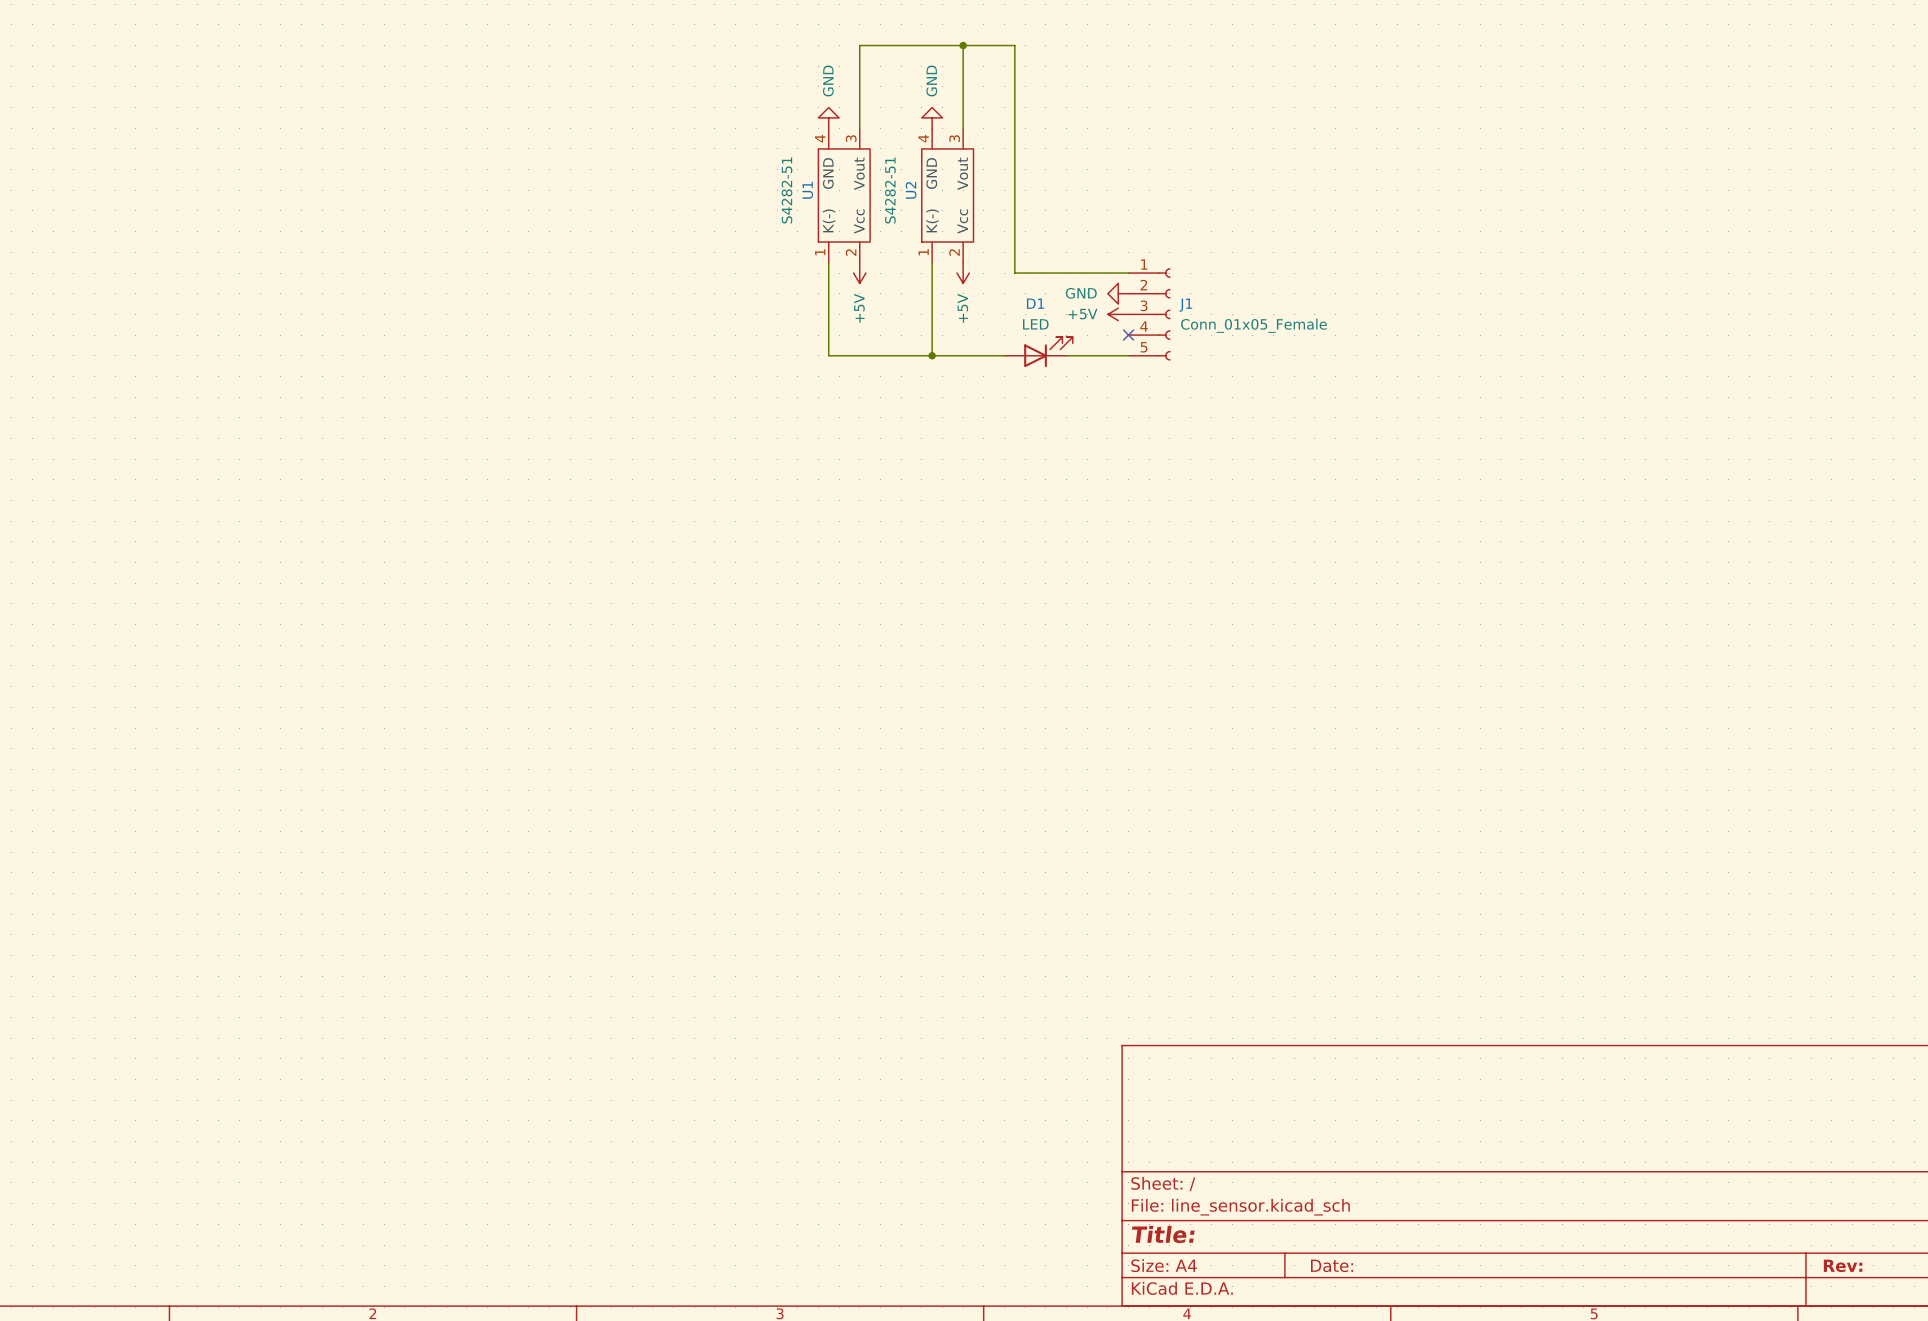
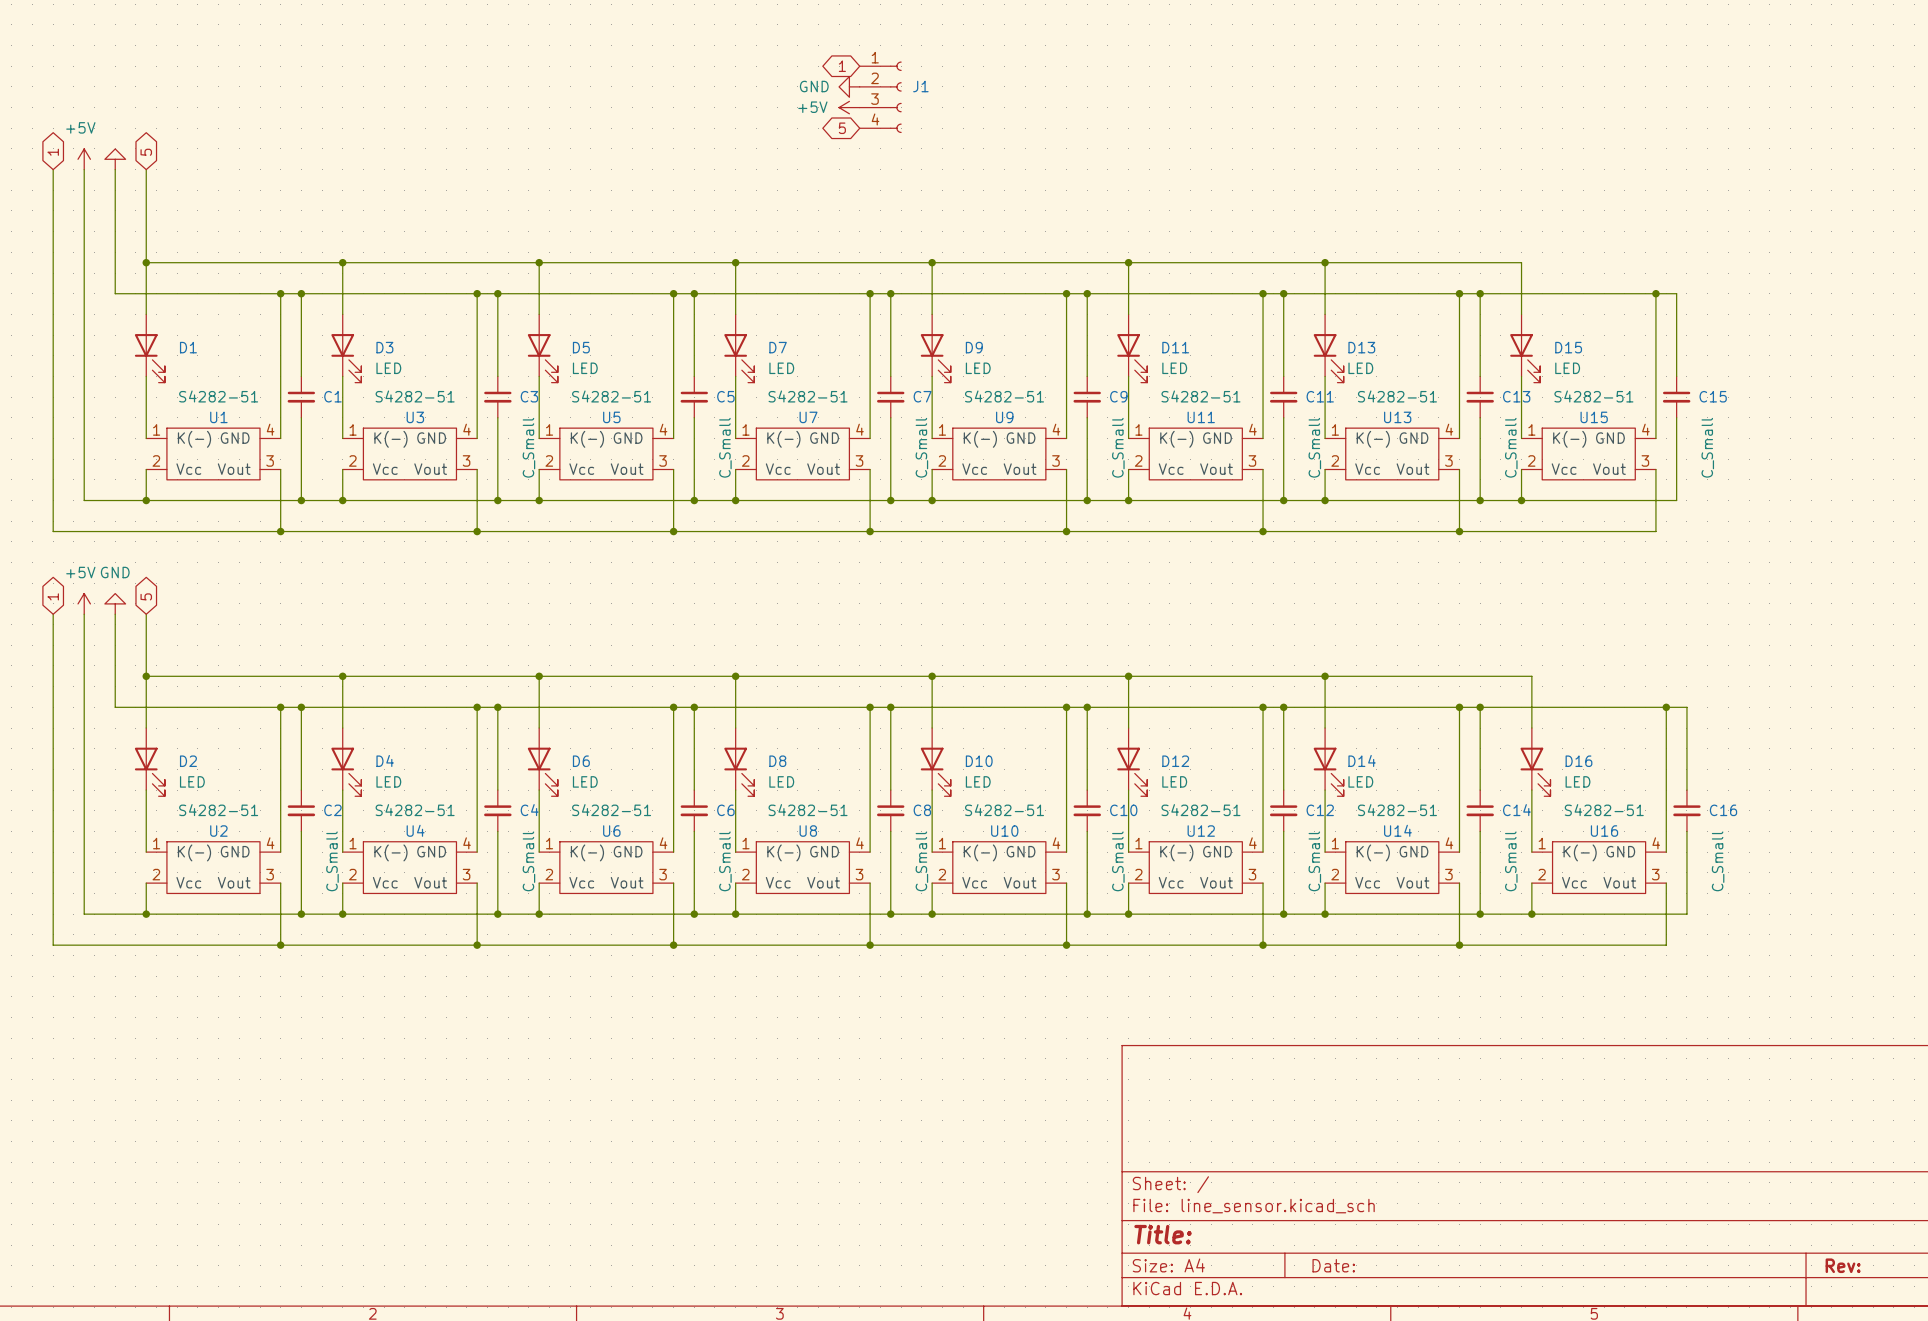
wire: (963, 45) (963, 128) -> none
junction: (963, 45) -> none
global label: none -> 1 (842, 66)
power symbol: none -> +5V (849, 107)
power symbol rotation: 0° (828, 117) -> 90° counterclockwise (849, 86)
power symbol position: GND (828, 117) -> GND (849, 86)
power symbol: GND (932, 117) -> none
global label: none -> 5 (842, 128)
wire: (859, 128) (859, 45) (1014, 45) (1014, 273) (1128, 273) -> none
global label: none -> 1 (53, 152)
global label: none -> 5 (146, 152)
power symbol: none -> +5V (84, 159)
power symbol: none -> (115, 159)
wire: none -> (53, 169) (53, 531) (1655, 531) (1655, 469)
wire: none -> (84, 169) (84, 500) (1676, 500) (1676, 417)
wire: none -> (115, 169) (115, 293) (1676, 293) (1676, 376)
wire: none -> (146, 169) (146, 314)
U1 rotation: 0° (844, 195) -> 90° clockwise (213, 453)
U1 position: (844, 195) -> (213, 453)
U2 rotation: 0° (947, 195) -> 90° clockwise (213, 867)
U2 position: (947, 195) -> (213, 867)
wire: none -> (146, 262) (1521, 262) (1521, 314)
junction: none -> (146, 262)
wire: none -> (342, 262) (342, 314)
junction: none -> (342, 262)
wire: none -> (539, 262) (539, 314)
junction: none -> (539, 262)
wire: none -> (735, 262) (735, 314)
junction: none -> (735, 262)
wire: (828, 262) (828, 355) (1004, 355) -> none
junction: none -> (932, 262)
wire: none -> (1128, 262) (1128, 314)
junction: none -> (1128, 262)
wire: none -> (1325, 262) (1325, 314)
junction: none -> (1325, 262)
J1 symbol: [1128, 268, 1171, 361] -> [859, 61, 902, 134]
power symbol: +5V (859, 273) -> none
power symbol: +5V (963, 273) -> none
wire: none -> (280, 293) (280, 438)
junction: none -> (280, 293)
wire: none -> (301, 293) (301, 376)
junction: none -> (301, 293)
wire: none -> (477, 293) (477, 438)
junction: none -> (477, 293)
wire: none -> (497, 293) (497, 376)
junction: none -> (497, 293)
wire: none -> (673, 293) (673, 438)
junction: none -> (673, 293)
wire: none -> (694, 293) (694, 376)
junction: none -> (694, 293)
wire: none -> (870, 293) (870, 438)
junction: none -> (870, 293)
wire: none -> (890, 293) (890, 376)
junction: none -> (890, 293)
wire: none -> (1066, 293) (1066, 438)
junction: none -> (1066, 293)
wire: none -> (1087, 293) (1087, 376)
junction: none -> (1087, 293)
power symbol: GND (1118, 293) -> none
wire: none -> (1263, 293) (1263, 438)
junction: none -> (1263, 293)
wire: none -> (1283, 293) (1283, 376)
junction: none -> (1283, 293)
wire: none -> (1459, 293) (1459, 438)
junction: none -> (1459, 293)
wire: none -> (1480, 293) (1480, 376)
junction: none -> (1480, 293)
wire: none -> (1655, 293) (1655, 438)
junction: none -> (1655, 293)
power symbol: +5V (1118, 314) -> none
D1 value: LED (1035, 324) -> none
J1 value: Conn_01x05_Female (1253, 325) -> none
no-connect mark: (1128, 335) -> none
D3: none -> LED (346, 348)
D5: none -> LED (542, 348)
D7: none -> LED (739, 348)
D9: none -> LED (935, 348)
D11: none -> LED (1132, 348)
D13: none -> LED (1328, 348)
D15: none -> LED (1525, 348)
D1 position: (1038, 352) -> (149, 348)
D1 rotation: 0° (1048, 352) -> 90° clockwise (149, 358)
junction: (932, 355) -> none
wire: (1066, 355) (1128, 355) -> none
wire: none -> (146, 376) (146, 438)
wire: none -> (342, 376) (342, 438)
wire: none -> (539, 376) (539, 438)
wire: none -> (735, 376) (735, 438)
wire: none -> (932, 376) (932, 438)
wire: none -> (1128, 376) (1128, 438)
wire: none -> (1325, 376) (1325, 438)
wire: none -> (1521, 376) (1521, 438)
C1: none -> (301, 397)
C3: none -> C_Small (497, 397)
C5: none -> C_Small (694, 397)
C7: none -> C_Small (890, 397)
C9: none -> C_Small (1087, 397)
C11: none -> C_Small (1283, 397)
C13: none -> C_Small (1480, 397)
C15: none -> C_Small (1676, 397)
wire: none -> (301, 417) (301, 500)
wire: none -> (497, 417) (497, 500)
wire: none -> (694, 417) (694, 500)
wire: none -> (890, 417) (890, 500)
wire: none -> (1087, 417) (1087, 500)
wire: none -> (1283, 417) (1283, 500)
wire: none -> (1480, 417) (1480, 500)
U3: none -> S4282-51 (409, 453)
U5: none -> S4282-51 (606, 453)
U7: none -> S4282-51 (802, 453)
U9: none -> S4282-51 (999, 453)
U11: none -> S4282-51 (1195, 453)
U13: none -> S4282-51 (1392, 453)
U15: none -> S4282-51 (1588, 453)
wire: none -> (146, 469) (146, 500)
wire: none -> (280, 469) (280, 531)
wire: none -> (342, 469) (342, 500)
wire: none -> (477, 469) (477, 531)
wire: none -> (539, 469) (539, 500)
wire: none -> (673, 469) (673, 531)
wire: none -> (735, 469) (735, 500)
wire: none -> (870, 469) (870, 531)
wire: none -> (932, 469) (932, 500)
wire: none -> (1066, 469) (1066, 531)
wire: none -> (1128, 469) (1128, 500)
wire: none -> (1263, 469) (1263, 531)
wire: none -> (1325, 469) (1325, 500)
wire: none -> (1459, 469) (1459, 531)
wire: none -> (1521, 469) (1521, 500)
junction: none -> (146, 500)
junction: none -> (301, 500)
junction: none -> (342, 500)
junction: none -> (497, 500)
junction: none -> (539, 500)
junction: none -> (694, 500)
junction: none -> (735, 500)
junction: none -> (890, 500)
junction: none -> (932, 500)
junction: none -> (1087, 500)
junction: none -> (1128, 500)
junction: none -> (1283, 500)
junction: none -> (1325, 500)
junction: none -> (1480, 500)
junction: none -> (1521, 500)
junction: none -> (280, 531)
junction: none -> (477, 531)
junction: none -> (673, 531)
junction: none -> (870, 531)
junction: none -> (1066, 531)
junction: none -> (1263, 531)
junction: none -> (1459, 531)
global label: none -> 1 (53, 596)
global label: none -> 5 (146, 596)
power symbol: none -> +5V (84, 603)
power symbol: none -> GND (115, 603)
wire: none -> (53, 614) (53, 945) (1666, 945) (1666, 883)
wire: none -> (84, 614) (84, 914) (1686, 914) (1686, 831)
wire: none -> (115, 614) (115, 707) (1686, 707) (1686, 790)
wire: none -> (146, 614) (146, 728)
wire: none -> (146, 676) (1531, 676) (1531, 728)
junction: none -> (146, 676)
wire: none -> (342, 676) (342, 728)
junction: none -> (342, 676)
wire: none -> (539, 676) (539, 728)
junction: none -> (539, 676)
wire: none -> (735, 676) (735, 728)
junction: none -> (735, 676)
wire: none -> (932, 676) (932, 728)
junction: none -> (932, 676)
wire: none -> (1128, 676) (1128, 728)
junction: none -> (1128, 676)
wire: none -> (1325, 676) (1325, 728)
junction: none -> (1325, 676)
wire: none -> (280, 707) (280, 852)
junction: none -> (280, 707)
wire: none -> (301, 707) (301, 790)
junction: none -> (301, 707)
wire: none -> (477, 707) (477, 852)
junction: none -> (477, 707)
wire: none -> (497, 707) (497, 790)
junction: none -> (497, 707)
wire: none -> (673, 707) (673, 852)
junction: none -> (673, 707)
wire: none -> (694, 707) (694, 790)
junction: none -> (694, 707)
wire: none -> (870, 707) (870, 852)
junction: none -> (870, 707)
wire: none -> (890, 707) (890, 790)
junction: none -> (890, 707)
wire: none -> (1066, 707) (1066, 852)
junction: none -> (1066, 707)
wire: none -> (1087, 707) (1087, 790)
junction: none -> (1087, 707)
wire: none -> (1263, 707) (1263, 852)
junction: none -> (1263, 707)
wire: none -> (1283, 707) (1283, 790)
junction: none -> (1283, 707)
wire: none -> (1459, 707) (1459, 852)
junction: none -> (1459, 707)
wire: none -> (1480, 707) (1480, 790)
junction: none -> (1480, 707)
wire: none -> (1666, 707) (1666, 852)
junction: none -> (1666, 707)
D2: none -> LED (149, 762)
D4: none -> LED (346, 762)
D6: none -> LED (542, 762)
D8: none -> LED (739, 762)
D10: none -> LED (935, 762)
D12: none -> LED (1132, 762)
D14: none -> LED (1328, 762)
D16: none -> LED (1535, 762)
wire: none -> (146, 790) (146, 852)
wire: none -> (342, 790) (342, 852)
wire: none -> (539, 790) (539, 852)
wire: none -> (735, 790) (735, 852)
wire: none -> (932, 790) (932, 852)
wire: none -> (1128, 790) (1128, 852)
wire: none -> (1325, 790) (1325, 852)
wire: none -> (1531, 790) (1531, 852)
C2: none -> C_Small (301, 810)
C4: none -> C_Small (497, 810)
C6: none -> C_Small (694, 810)
C8: none -> C_Small (890, 810)
C10: none -> C_Small (1087, 810)
C12: none -> C_Small (1283, 810)
C14: none -> C_Small (1480, 810)
C16: none -> C_Small (1686, 810)
wire: none -> (301, 831) (301, 914)
wire: none -> (497, 831) (497, 914)
wire: none -> (694, 831) (694, 914)
wire: none -> (890, 831) (890, 914)
wire: none -> (1087, 831) (1087, 914)
wire: none -> (1283, 831) (1283, 914)
wire: none -> (1480, 831) (1480, 914)
U4: none -> S4282-51 (409, 867)
U6: none -> S4282-51 (606, 867)
U8: none -> S4282-51 (802, 867)
U10: none -> S4282-51 (999, 867)
U12: none -> S4282-51 (1195, 867)
U14: none -> S4282-51 (1392, 867)
U16: none -> S4282-51 (1599, 867)
wire: none -> (146, 883) (146, 914)
wire: none -> (280, 883) (280, 945)
wire: none -> (342, 883) (342, 914)
wire: none -> (477, 883) (477, 945)
wire: none -> (539, 883) (539, 914)
wire: none -> (673, 883) (673, 945)
wire: none -> (735, 883) (735, 914)
wire: none -> (870, 883) (870, 945)
wire: none -> (932, 883) (932, 914)
wire: none -> (1066, 883) (1066, 945)
wire: none -> (1128, 883) (1128, 914)
wire: none -> (1263, 883) (1263, 945)
wire: none -> (1325, 883) (1325, 914)
wire: none -> (1459, 883) (1459, 945)
wire: none -> (1531, 883) (1531, 914)
junction: none -> (146, 914)
junction: none -> (301, 914)
junction: none -> (342, 914)
junction: none -> (497, 914)
junction: none -> (539, 914)
junction: none -> (694, 914)
junction: none -> (735, 914)
junction: none -> (890, 914)
junction: none -> (932, 914)
junction: none -> (1087, 914)
junction: none -> (1128, 914)
junction: none -> (1283, 914)
junction: none -> (1325, 914)
junction: none -> (1480, 914)
junction: none -> (1531, 914)
junction: none -> (280, 945)
junction: none -> (477, 945)
junction: none -> (673, 945)
junction: none -> (870, 945)
junction: none -> (1066, 945)
junction: none -> (1263, 945)
junction: none -> (1459, 945)

